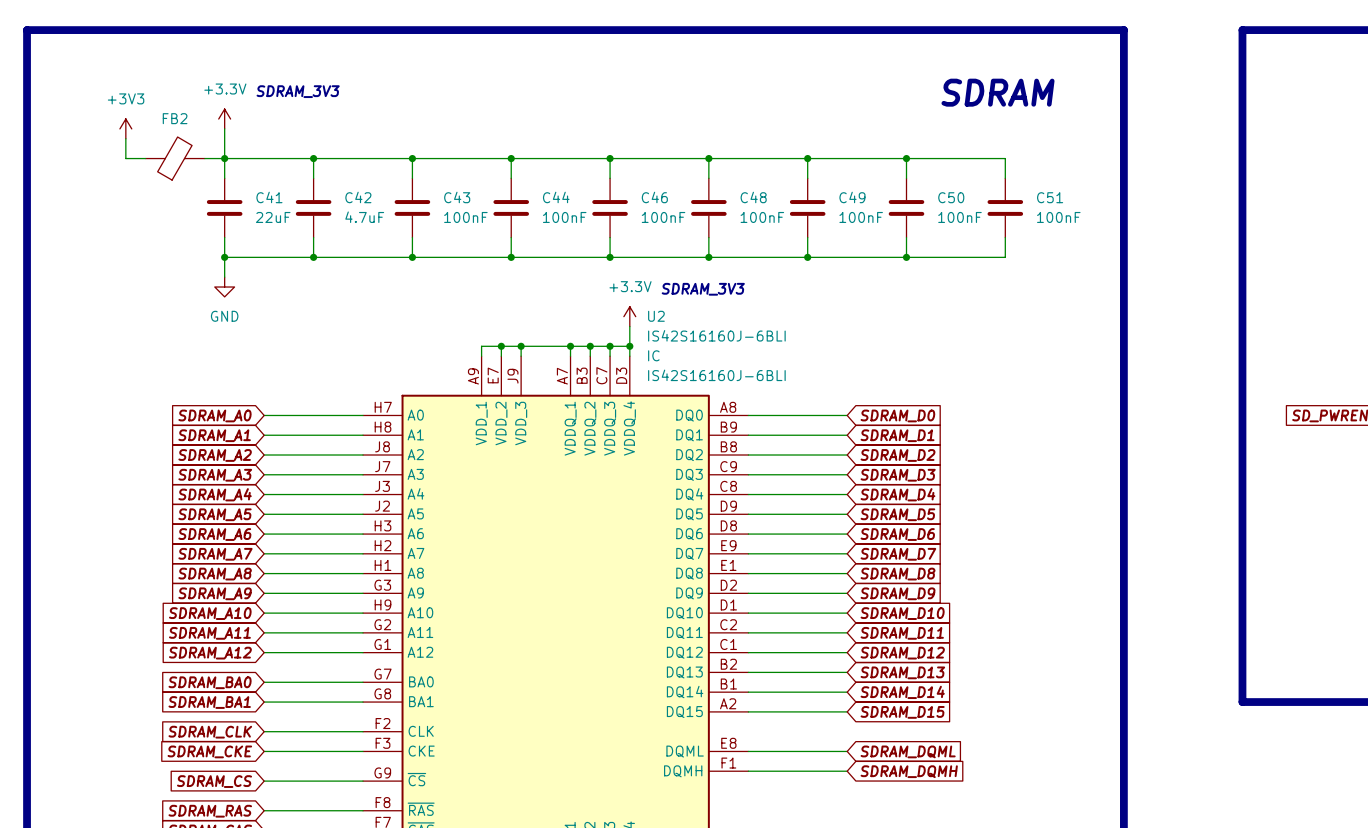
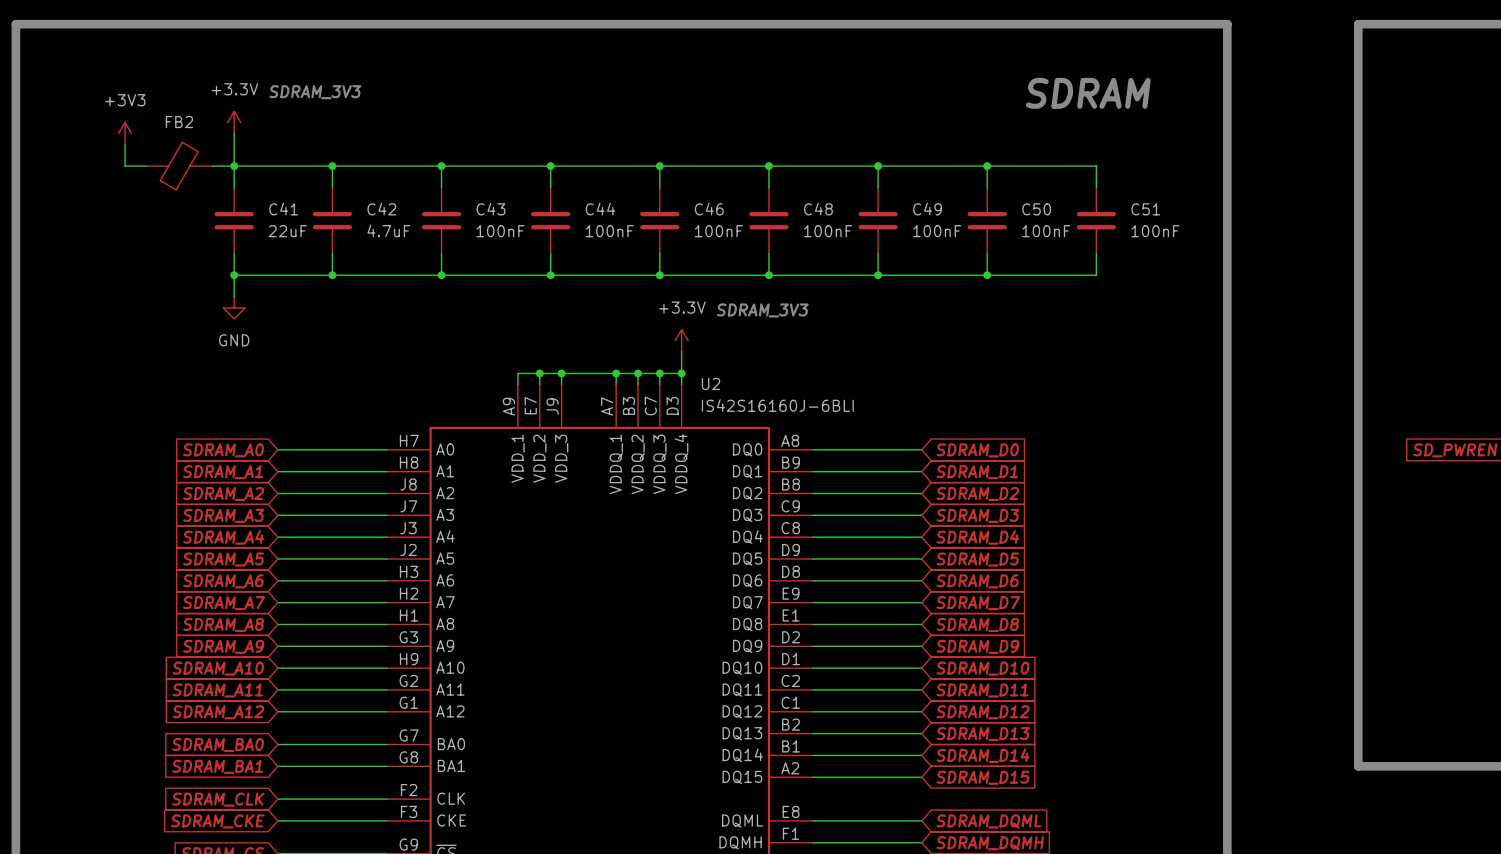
U2 name position: U2 (656, 316) -> U2 (711, 383)
U2 value position: IS42S16160J-6BLI (716, 335) -> IS42S16160J-6BLI (777, 405)
U2 text: IC (653, 355) -> none

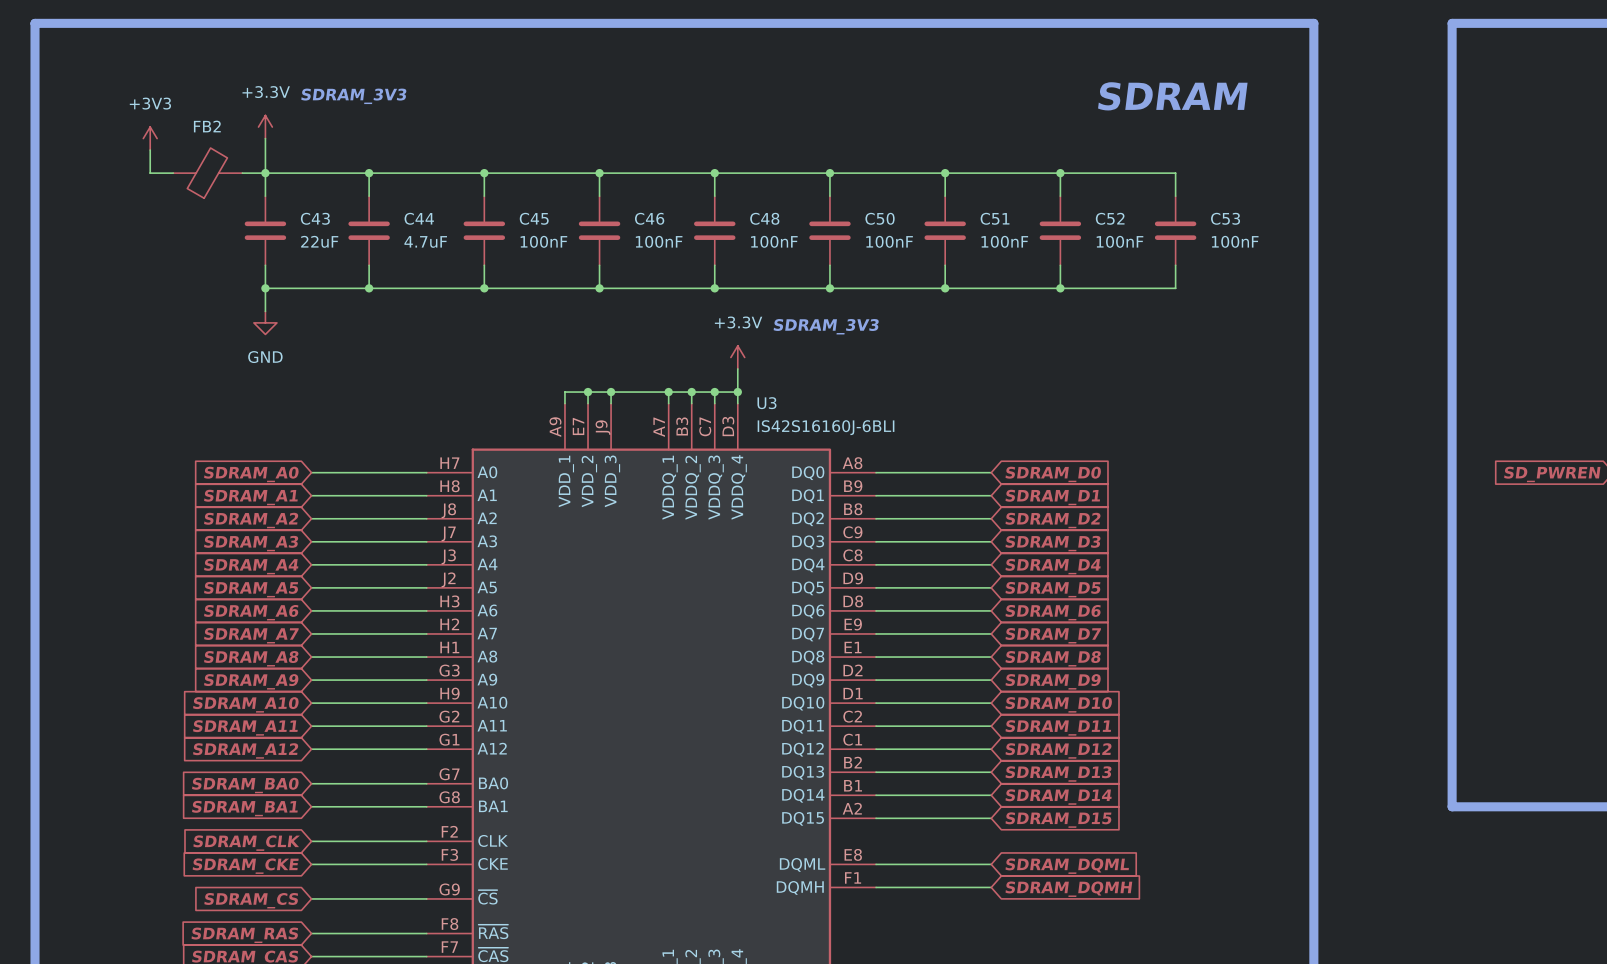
C41 name: C41 (283, 209) -> C43 (315, 218)
C42 name: C42 (381, 209) -> C44 (419, 218)
C43 name: C43 (490, 209) -> C45 (534, 218)
C44 name: C44 (600, 209) -> C46 (649, 218)
C46 name: C46 (709, 209) -> C48 (764, 218)
C48 name: C48 (818, 209) -> C50 (880, 218)
C49 name: C49 (927, 209) -> C51 (995, 218)
C50 name: C50 (1036, 209) -> C52 (1110, 218)
C51 name: C51 (1145, 209) -> C53 (1225, 218)
U2 name: U2 (711, 383) -> U3 (766, 403)

